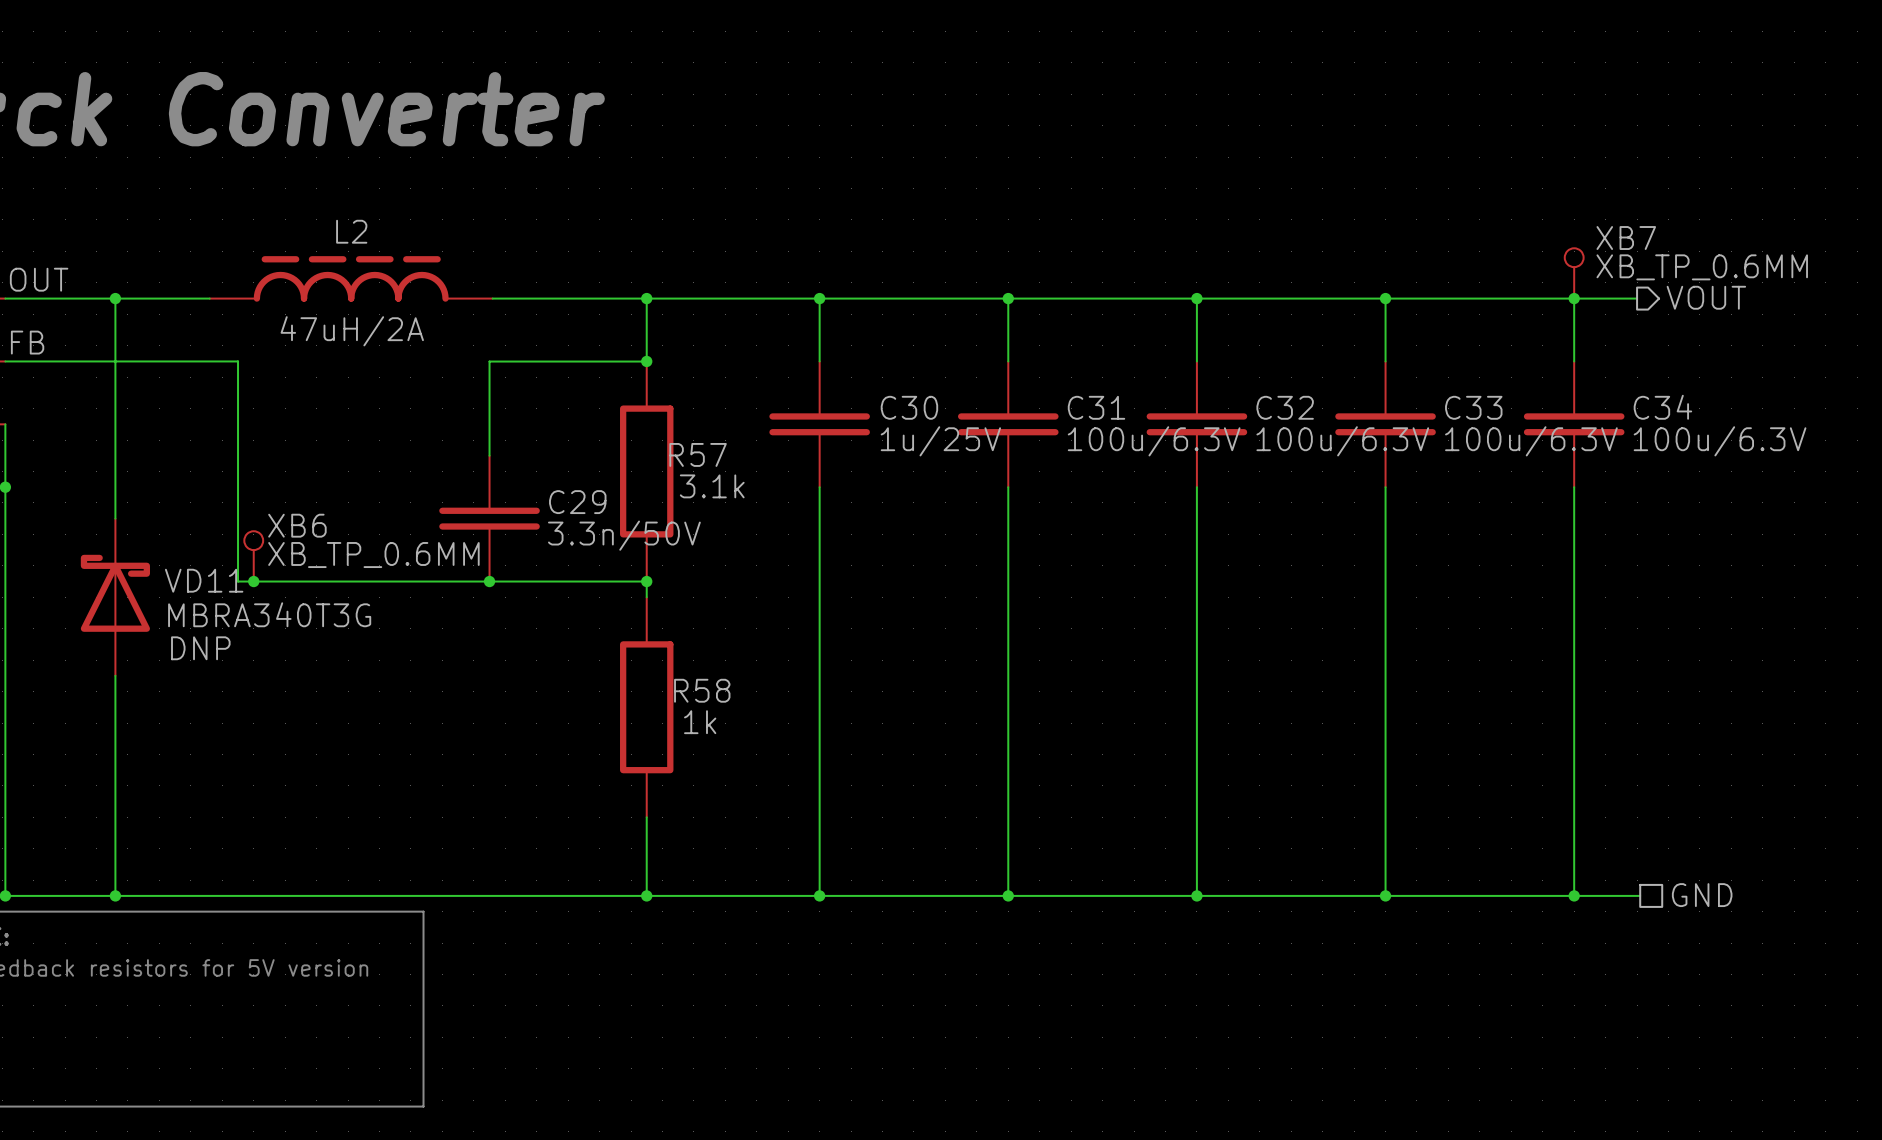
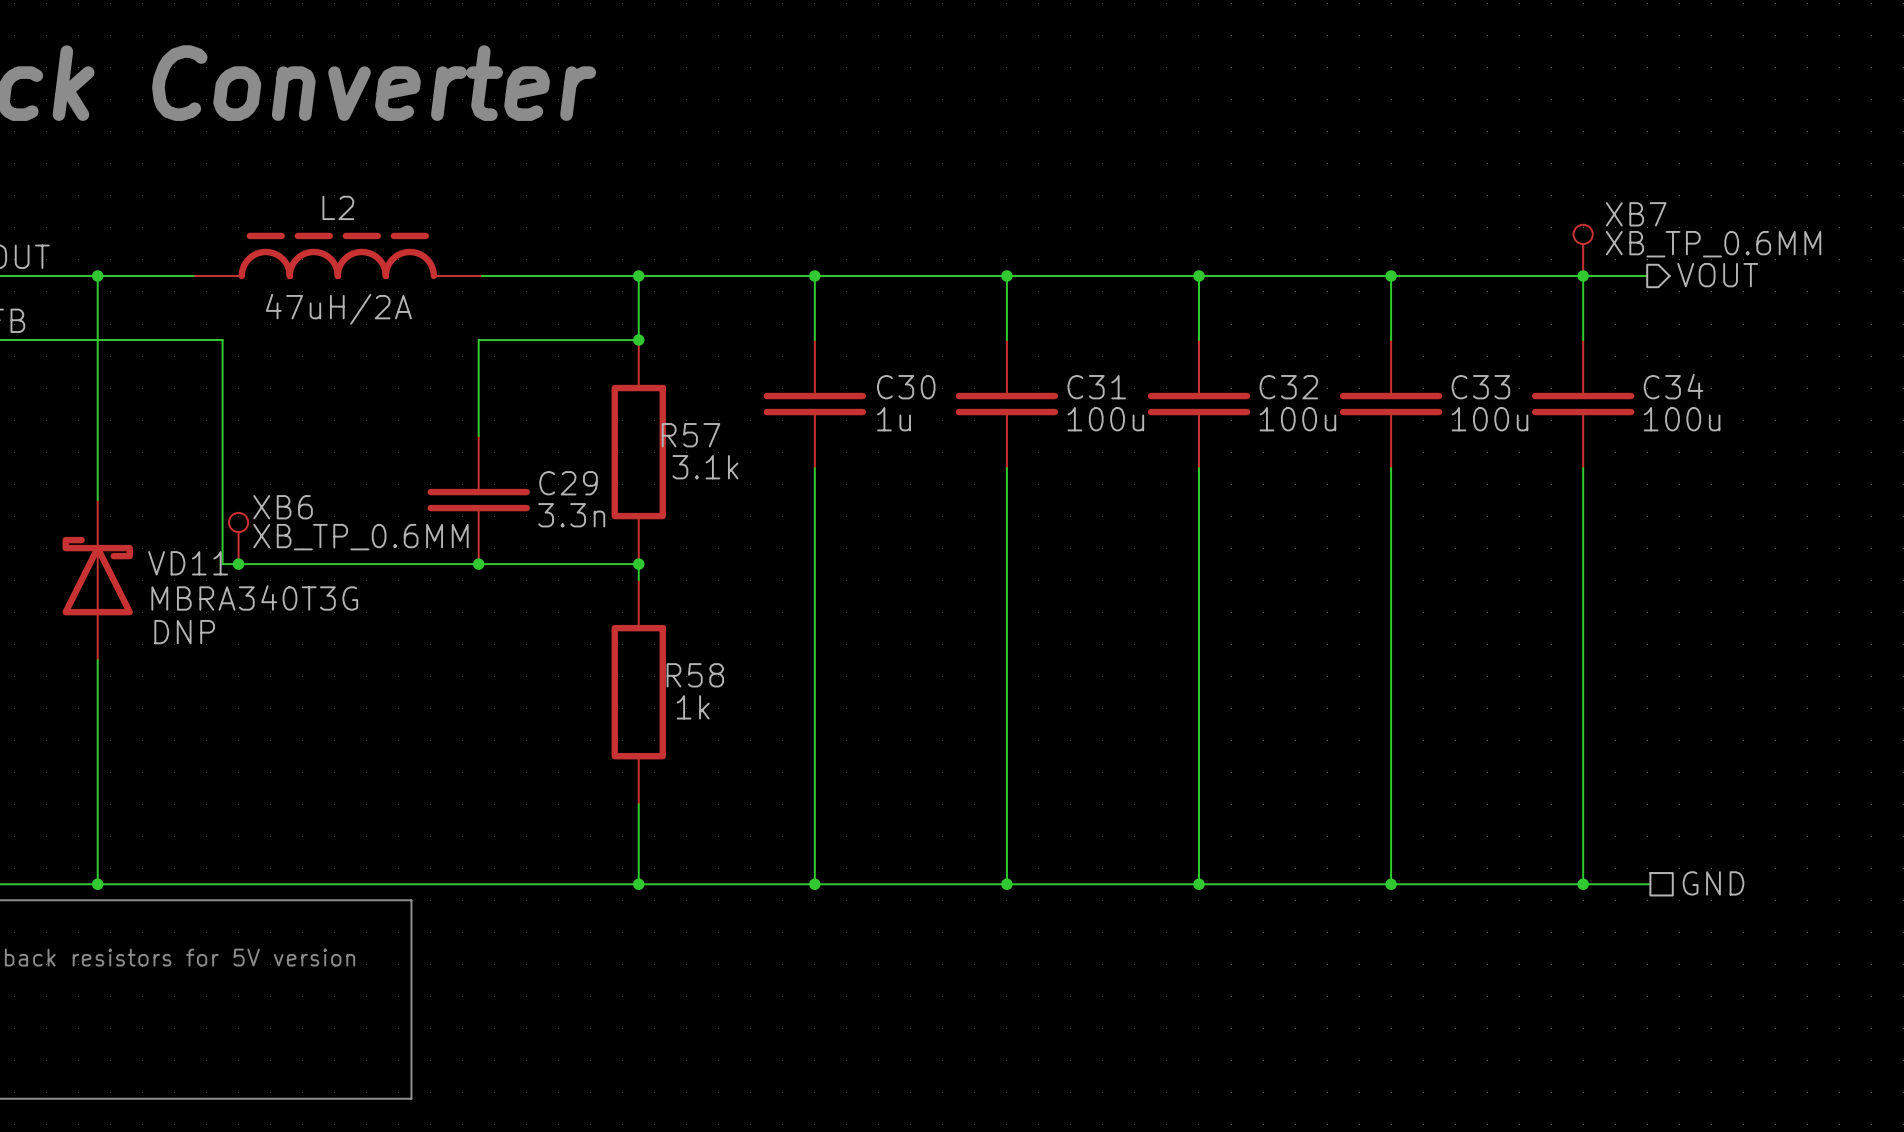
C30 value: 1u/25V (940, 441) -> 1u (893, 419)
C31 value: 100u/6.3V (1154, 441) -> 100u (1105, 419)
C32 value: 100u/6.3V (1342, 441) -> 100u (1297, 419)
C33 value: 100u/6.3V (1531, 441) -> 100u (1489, 419)
C34 value: 100u/6.3V (1720, 441) -> 100u (1682, 419)
C29 value: 3.3n/50V (624, 535) -> 3.3n (571, 515)

